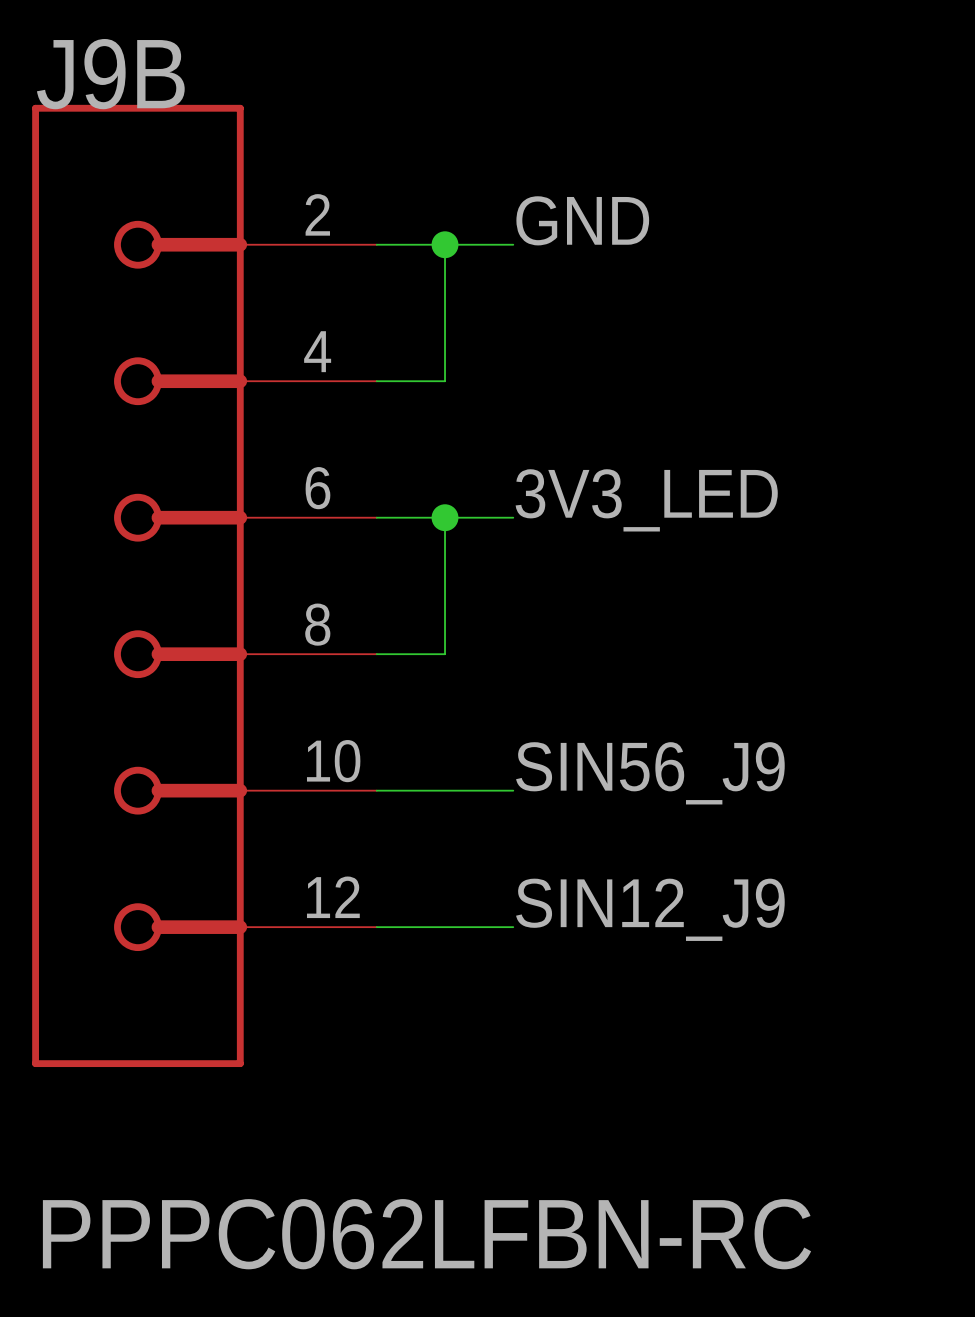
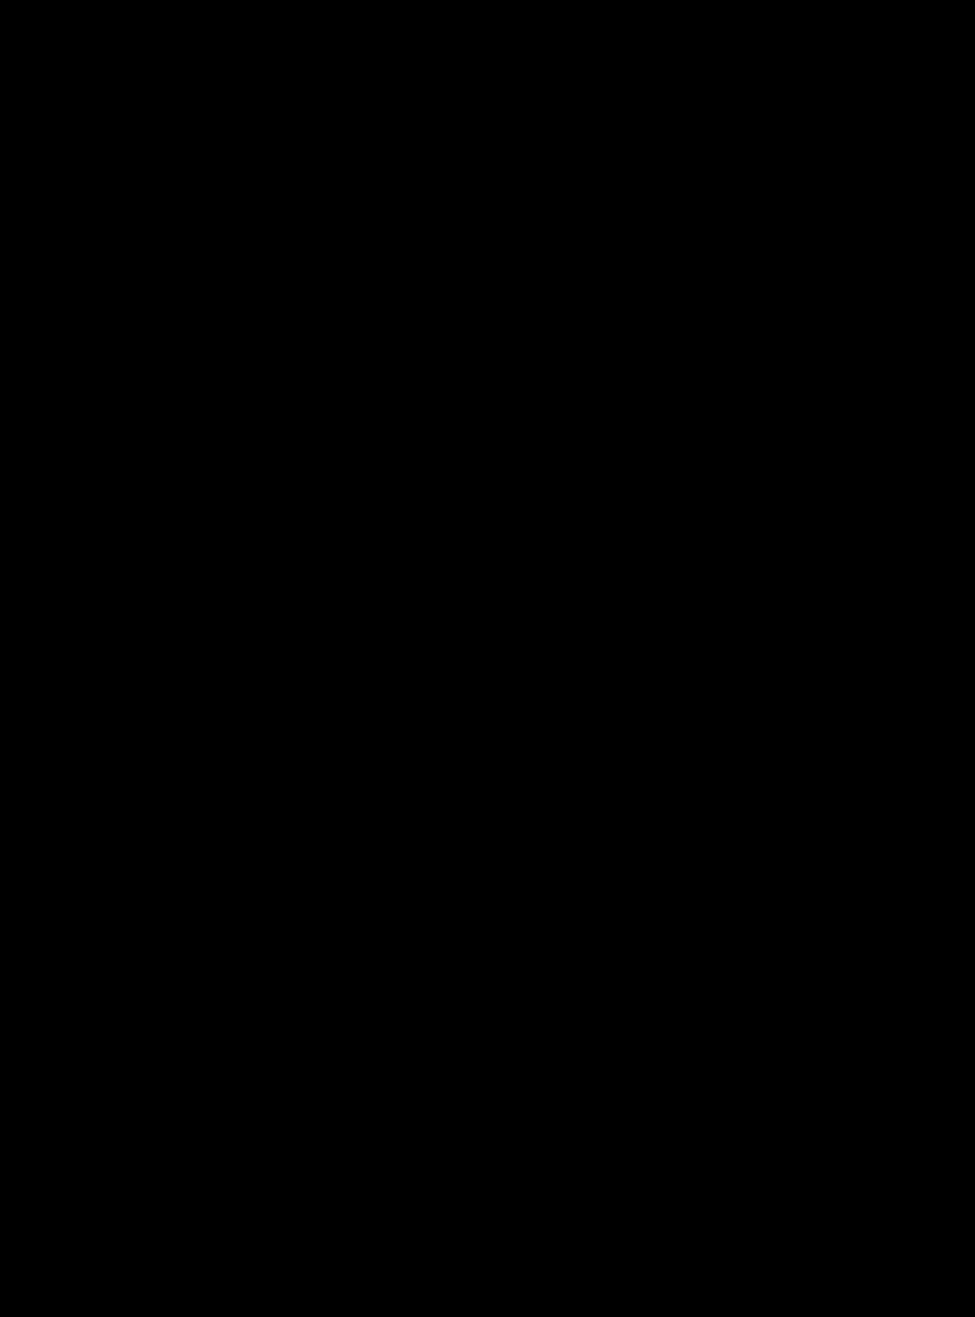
label: GND (582, 220) -> none
wire: (376, 244) (513, 244) -> none
wire: (445, 244) (445, 381) (376, 381) -> none
junction: (445, 244) -> none
label: 3V3_LED (646, 500) -> none
wire: (376, 517) (513, 517) -> none
wire: (445, 517) (445, 654) (376, 654) -> none
junction: (445, 517) -> none
J9B: (204, 585) -> none
label: SIN56_J9 (650, 773) -> none
wire: (376, 790) (513, 790) -> none
label: SIN12_J9 (650, 909) -> none
wire: (376, 927) (513, 927) -> none

